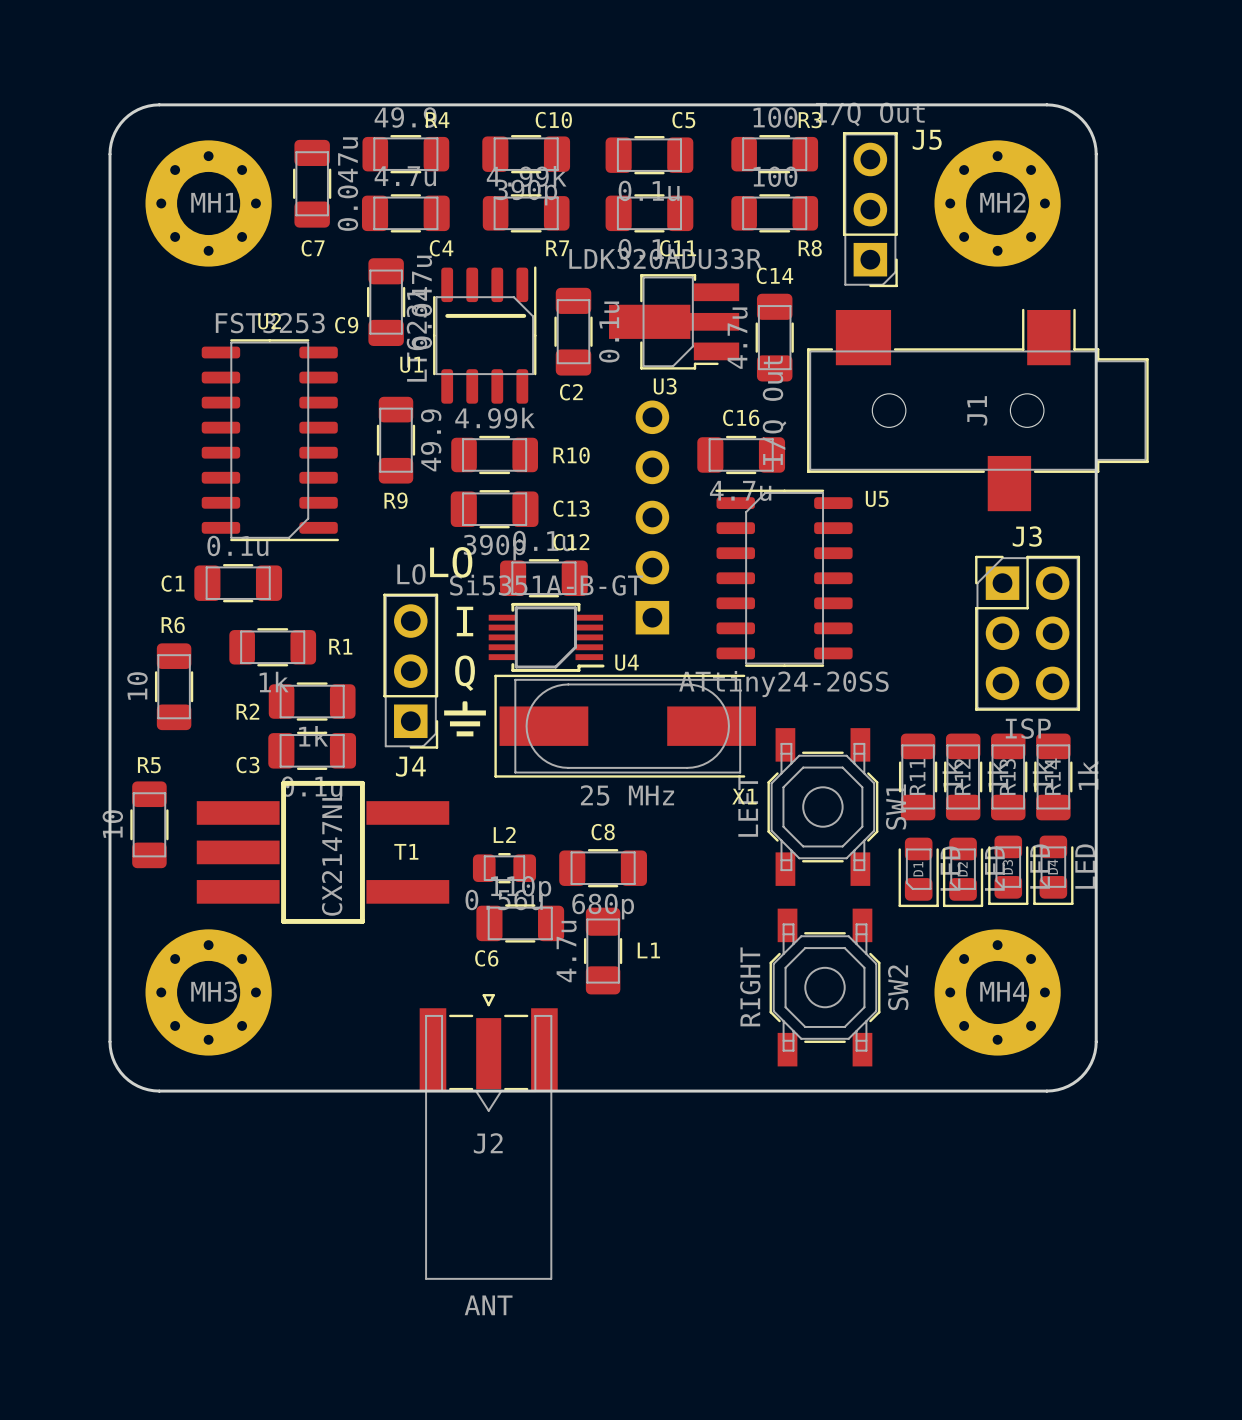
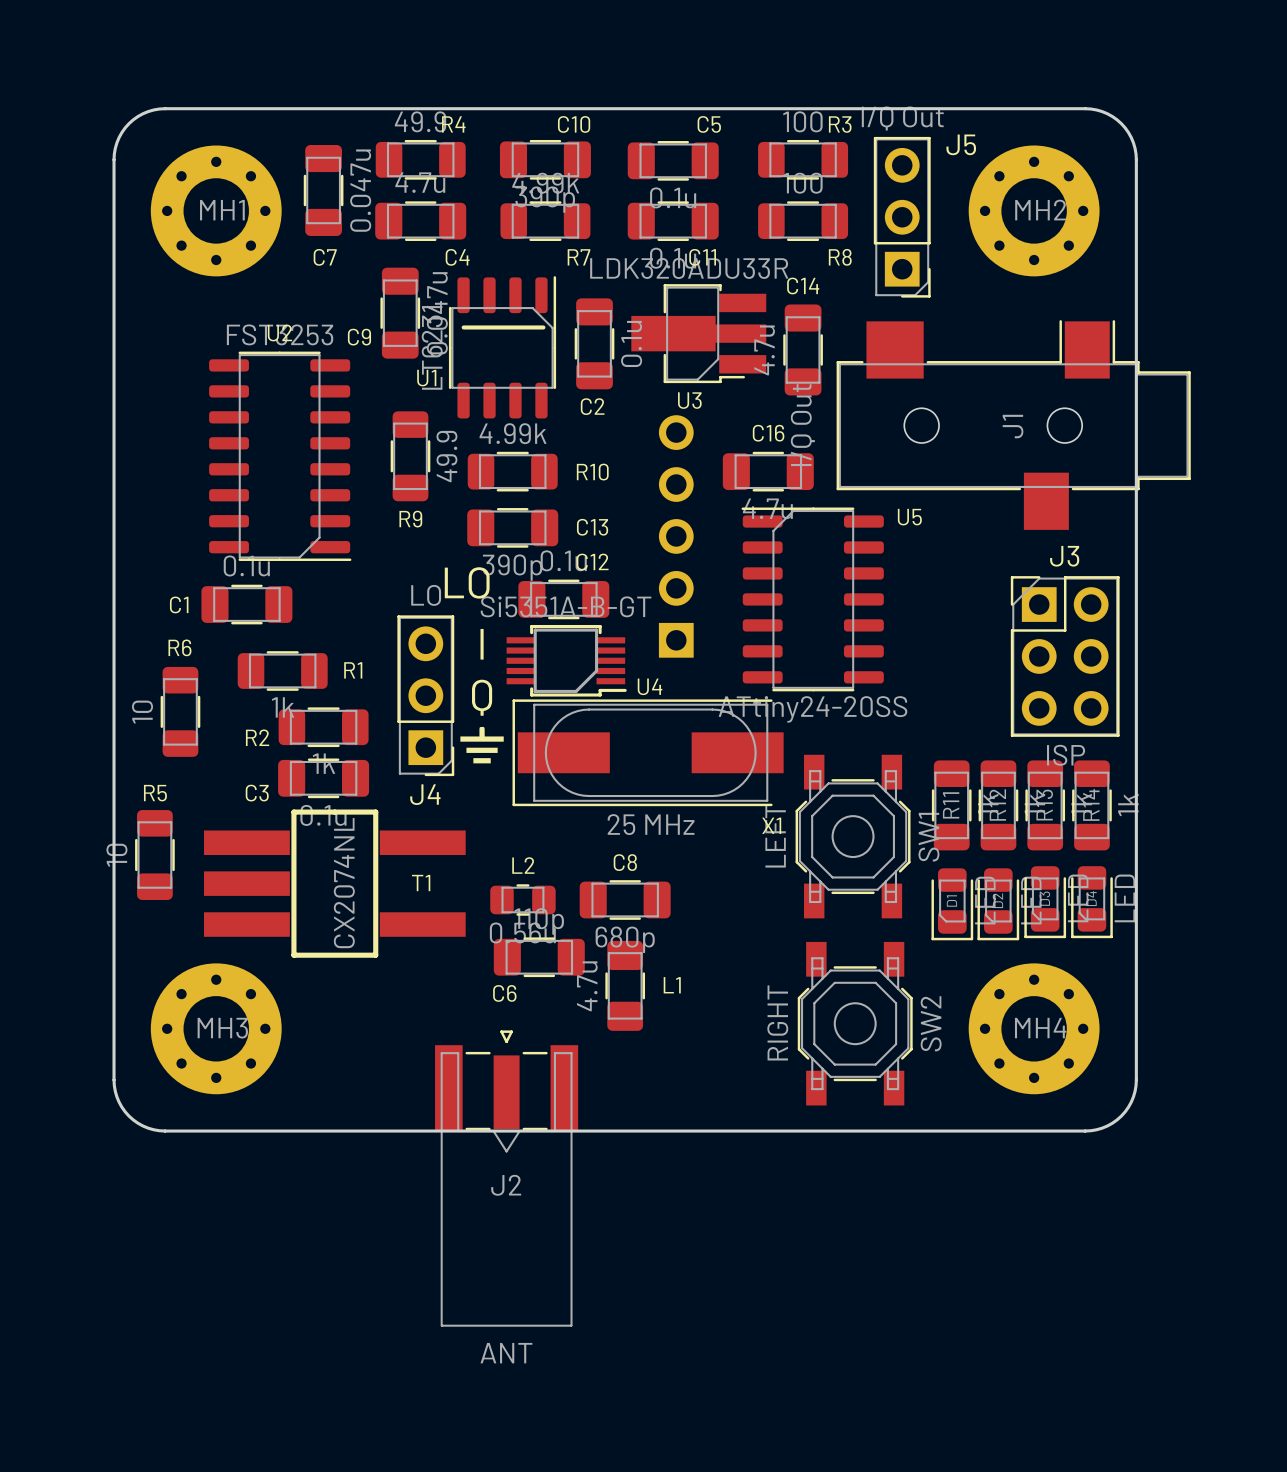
T1 value: CX2147NL (332, 852) -> CX2074NL (344, 883)

